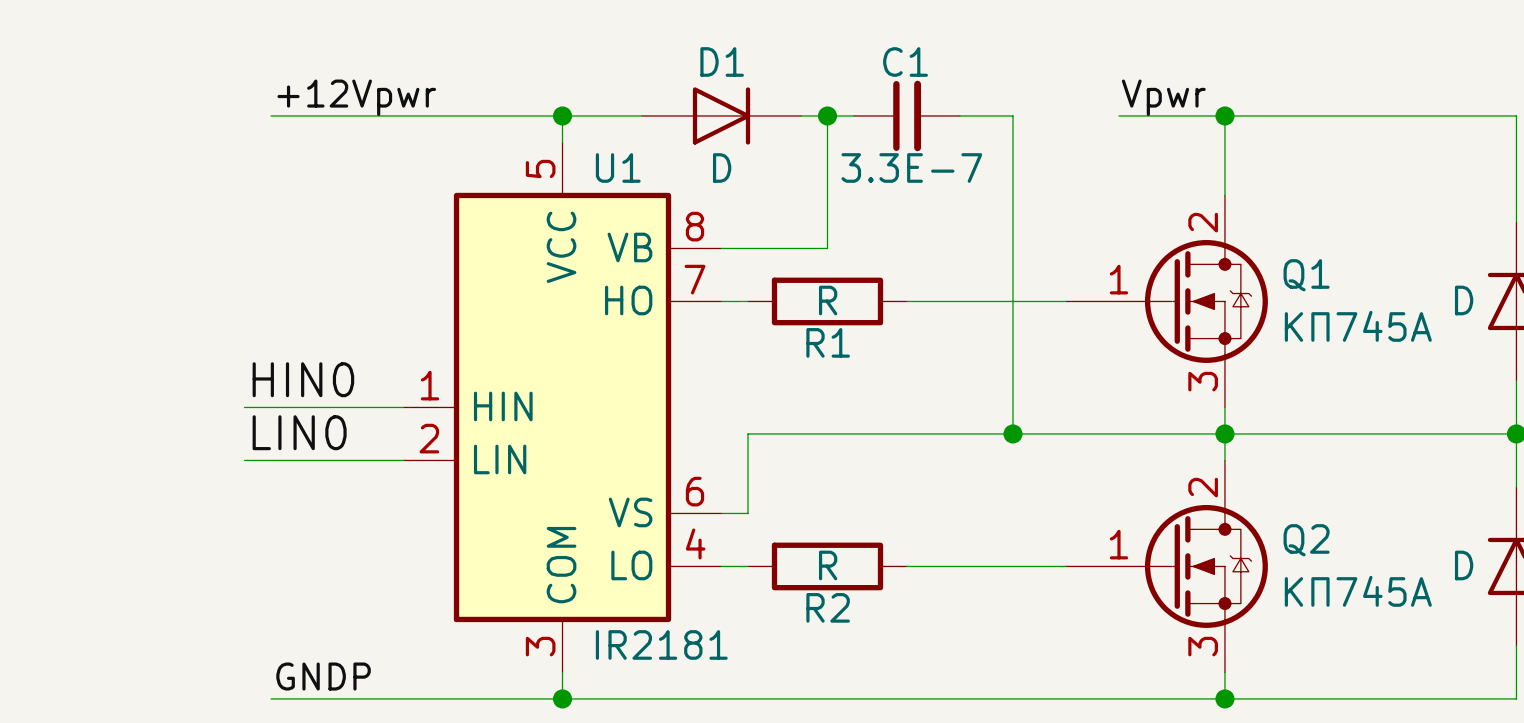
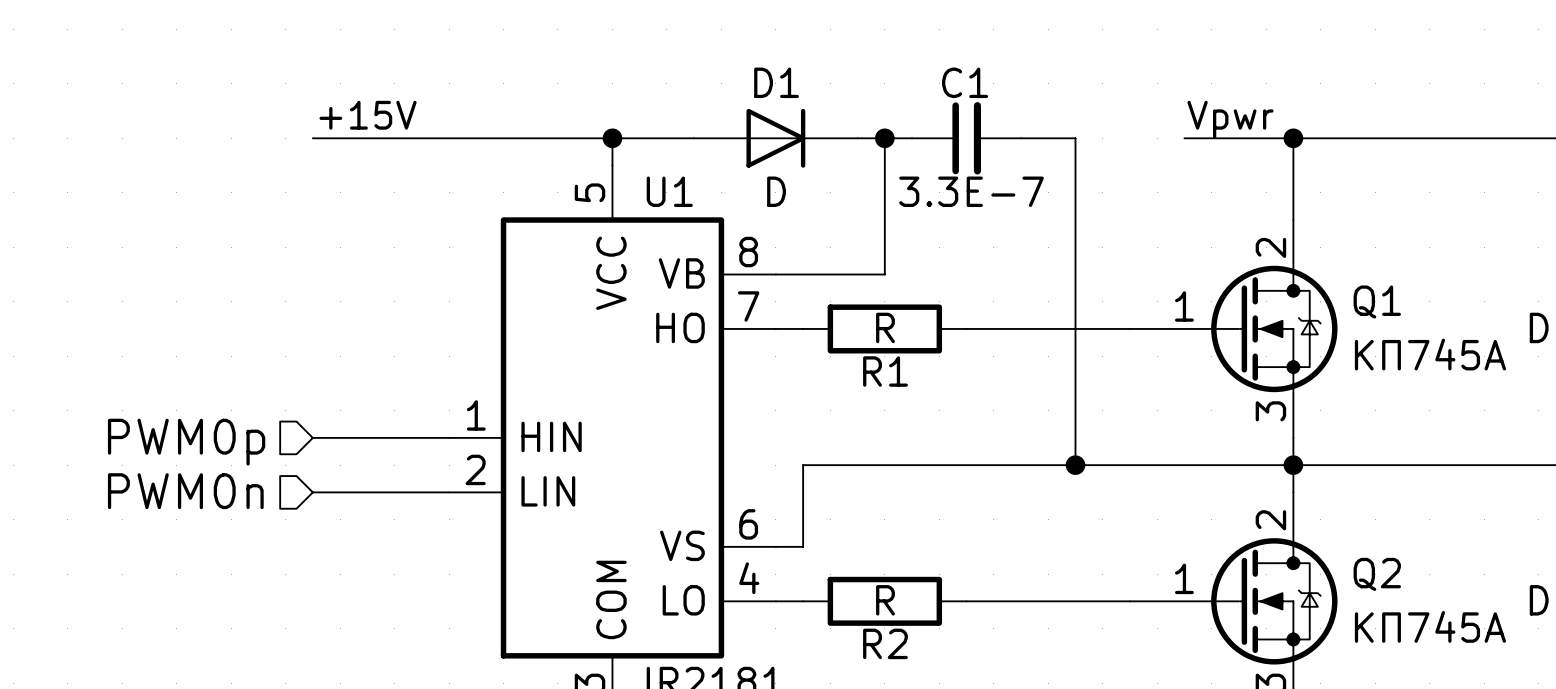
label: +12Vpwr (356, 97) -> +15V (368, 115)
label: HIN0 (303, 379) -> none
wire: (244, 407) (271, 407) -> none
hierarchical label: none -> PWM0p (186, 442)
label: LIN0 (299, 432) -> none
hierarchical label: none -> PWM0n (185, 491)
wire: (244, 460) (271, 460) -> none

